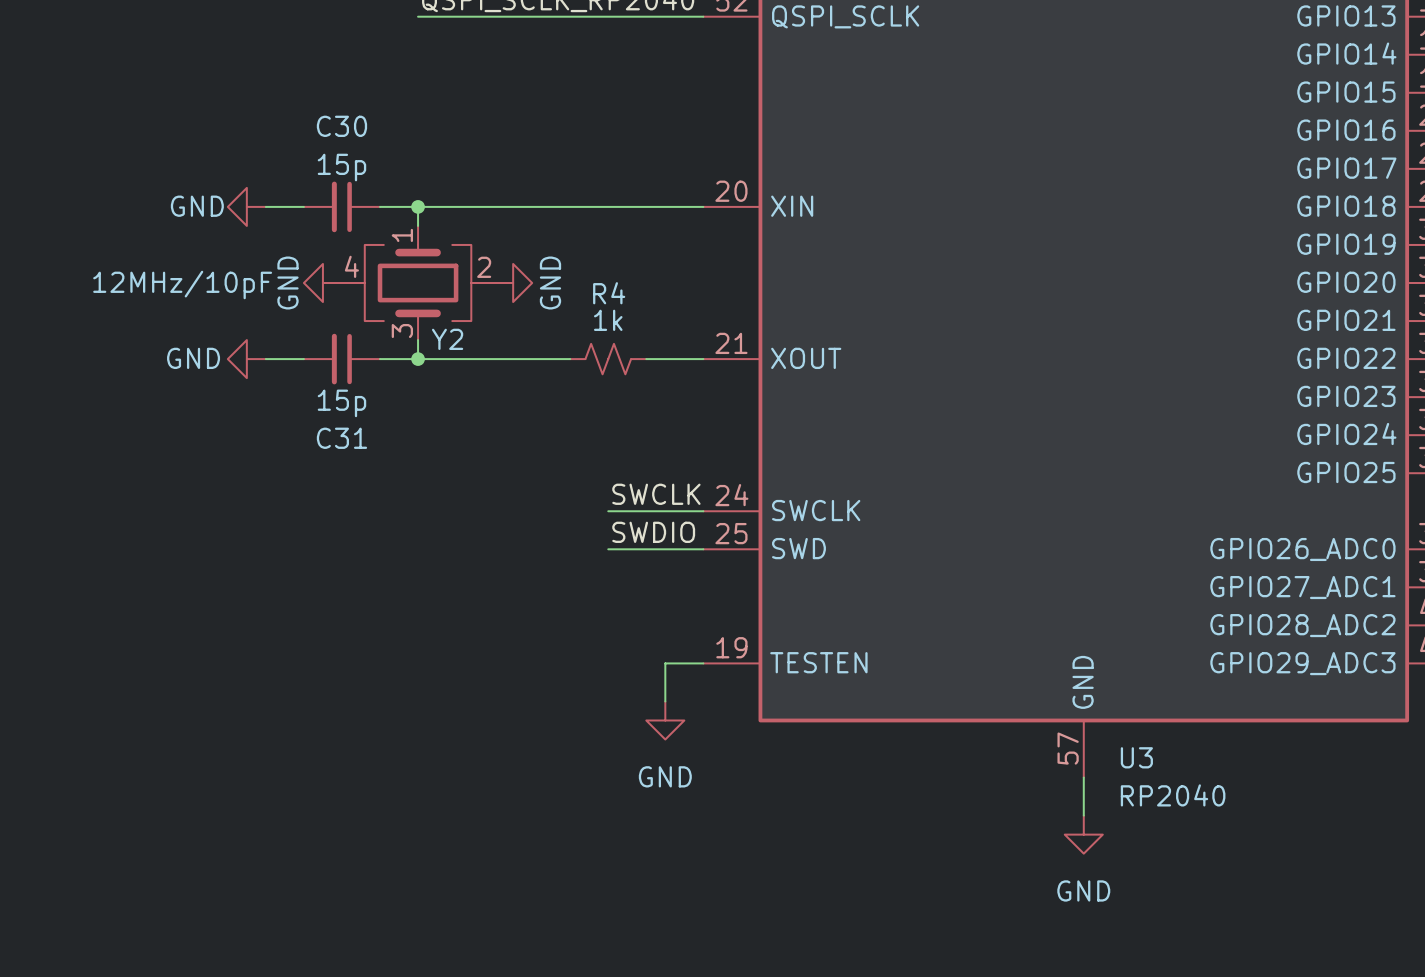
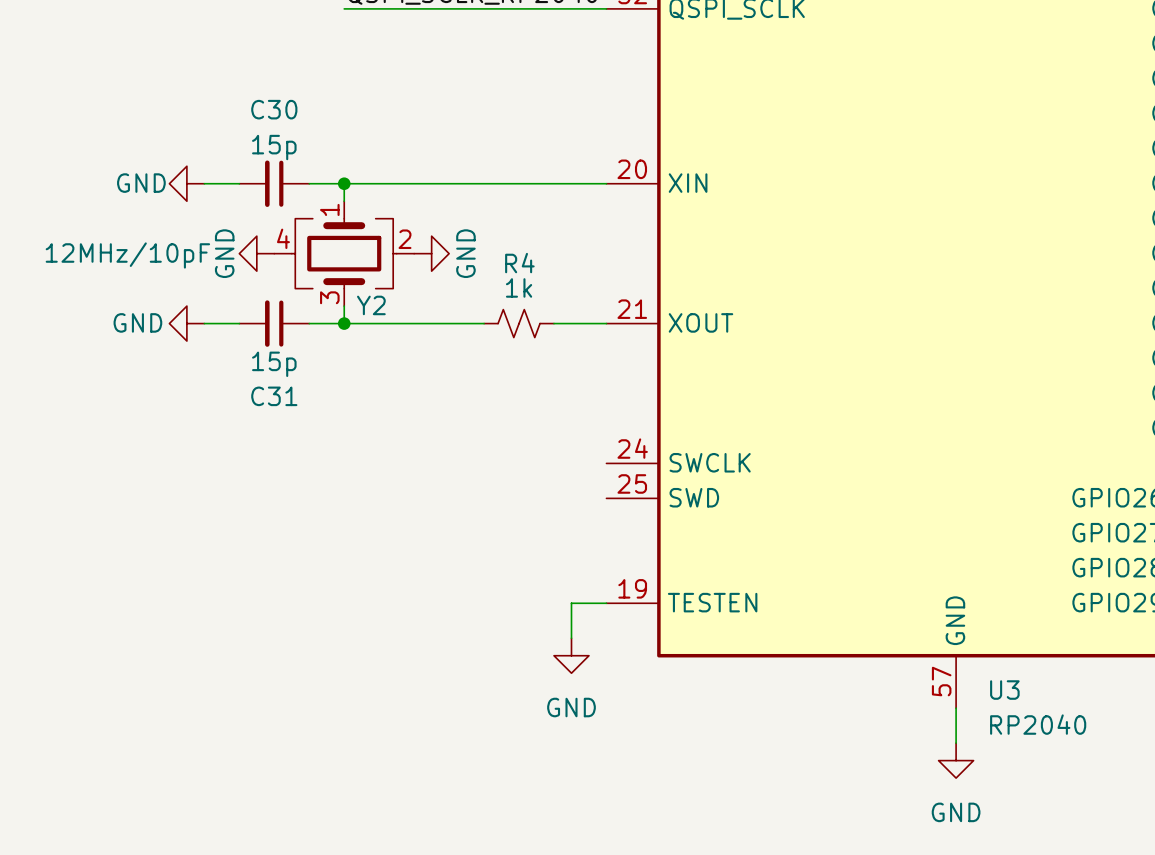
label: SWCLK (656, 494) -> none
wire: (608, 511) (703, 511) -> none
label: SWDIO (653, 532) -> none
wire: (608, 549) (703, 549) -> none

